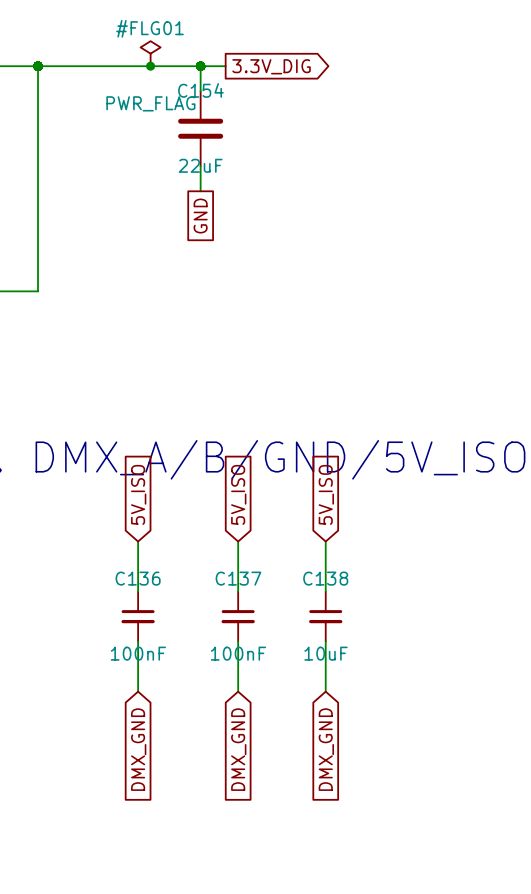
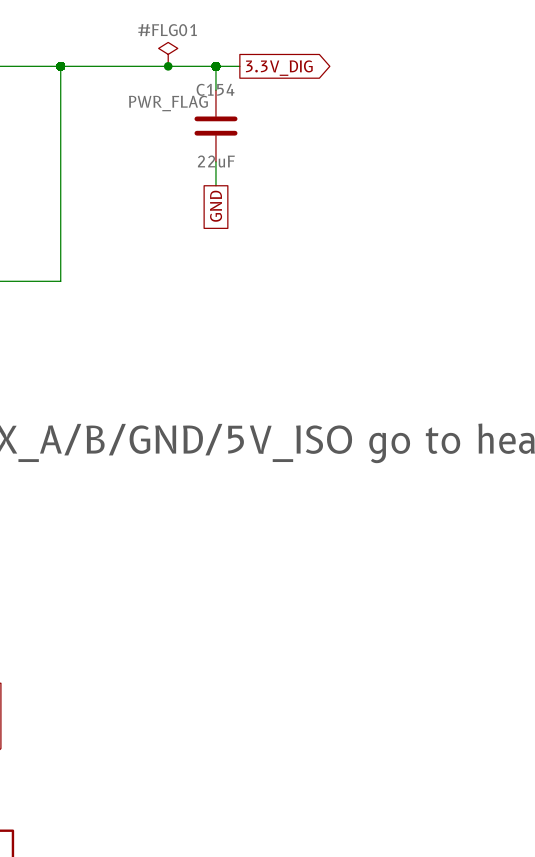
global label: 5V_ISO (138, 494) -> none
global label: 5V_ISO (238, 494) -> none
global label: 5V_ISO (326, 494) -> none
wire: (138, 541) (138, 591) -> none
wire: (238, 541) (238, 591) -> none
wire: (325, 541) (325, 591) -> none
C136: 100nF (138, 616) -> none
C137: 100nF (238, 616) -> none
C138: 10uF (325, 616) -> none
wire: (138, 641) (138, 691) -> none
wire: (238, 641) (238, 691) -> none
wire: (325, 641) (325, 691) -> none
global label: DMX_GND (138, 749) -> none
global label: DMX_GND (238, 749) -> none
global label: DMX_GND (326, 749) -> none

